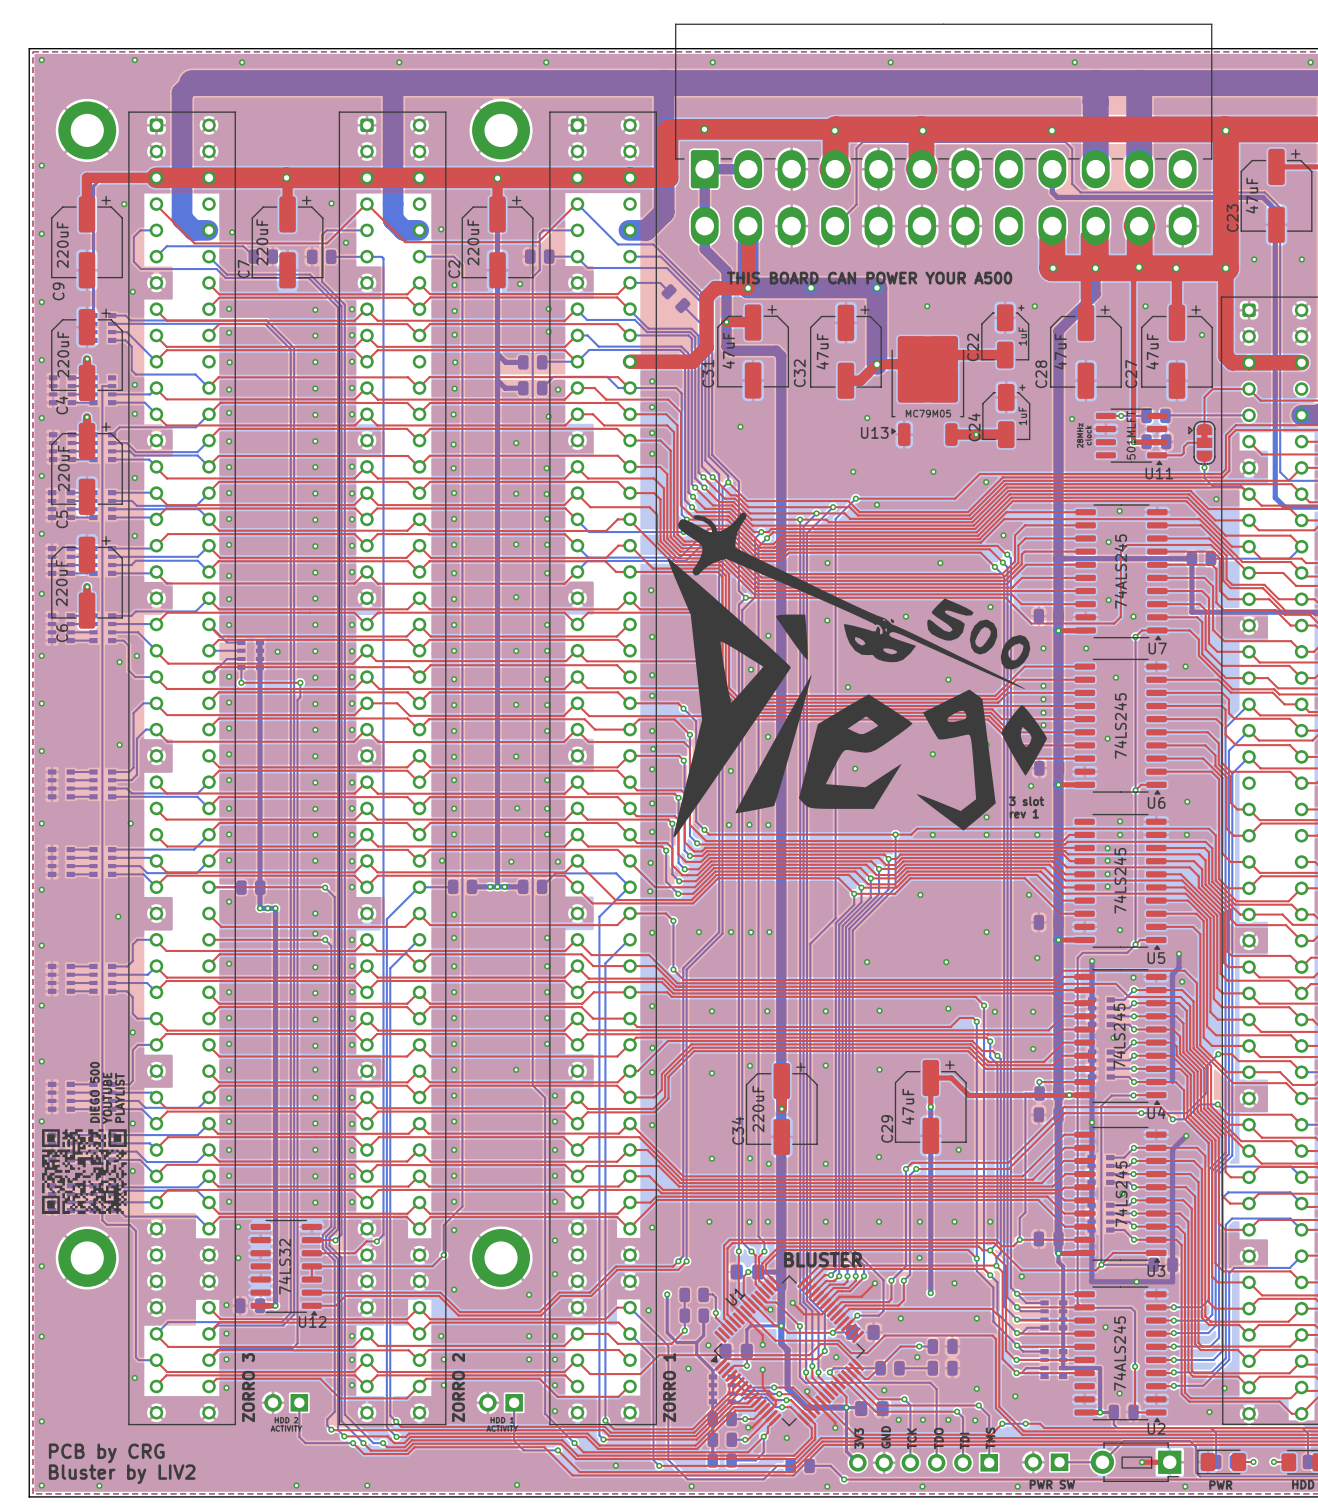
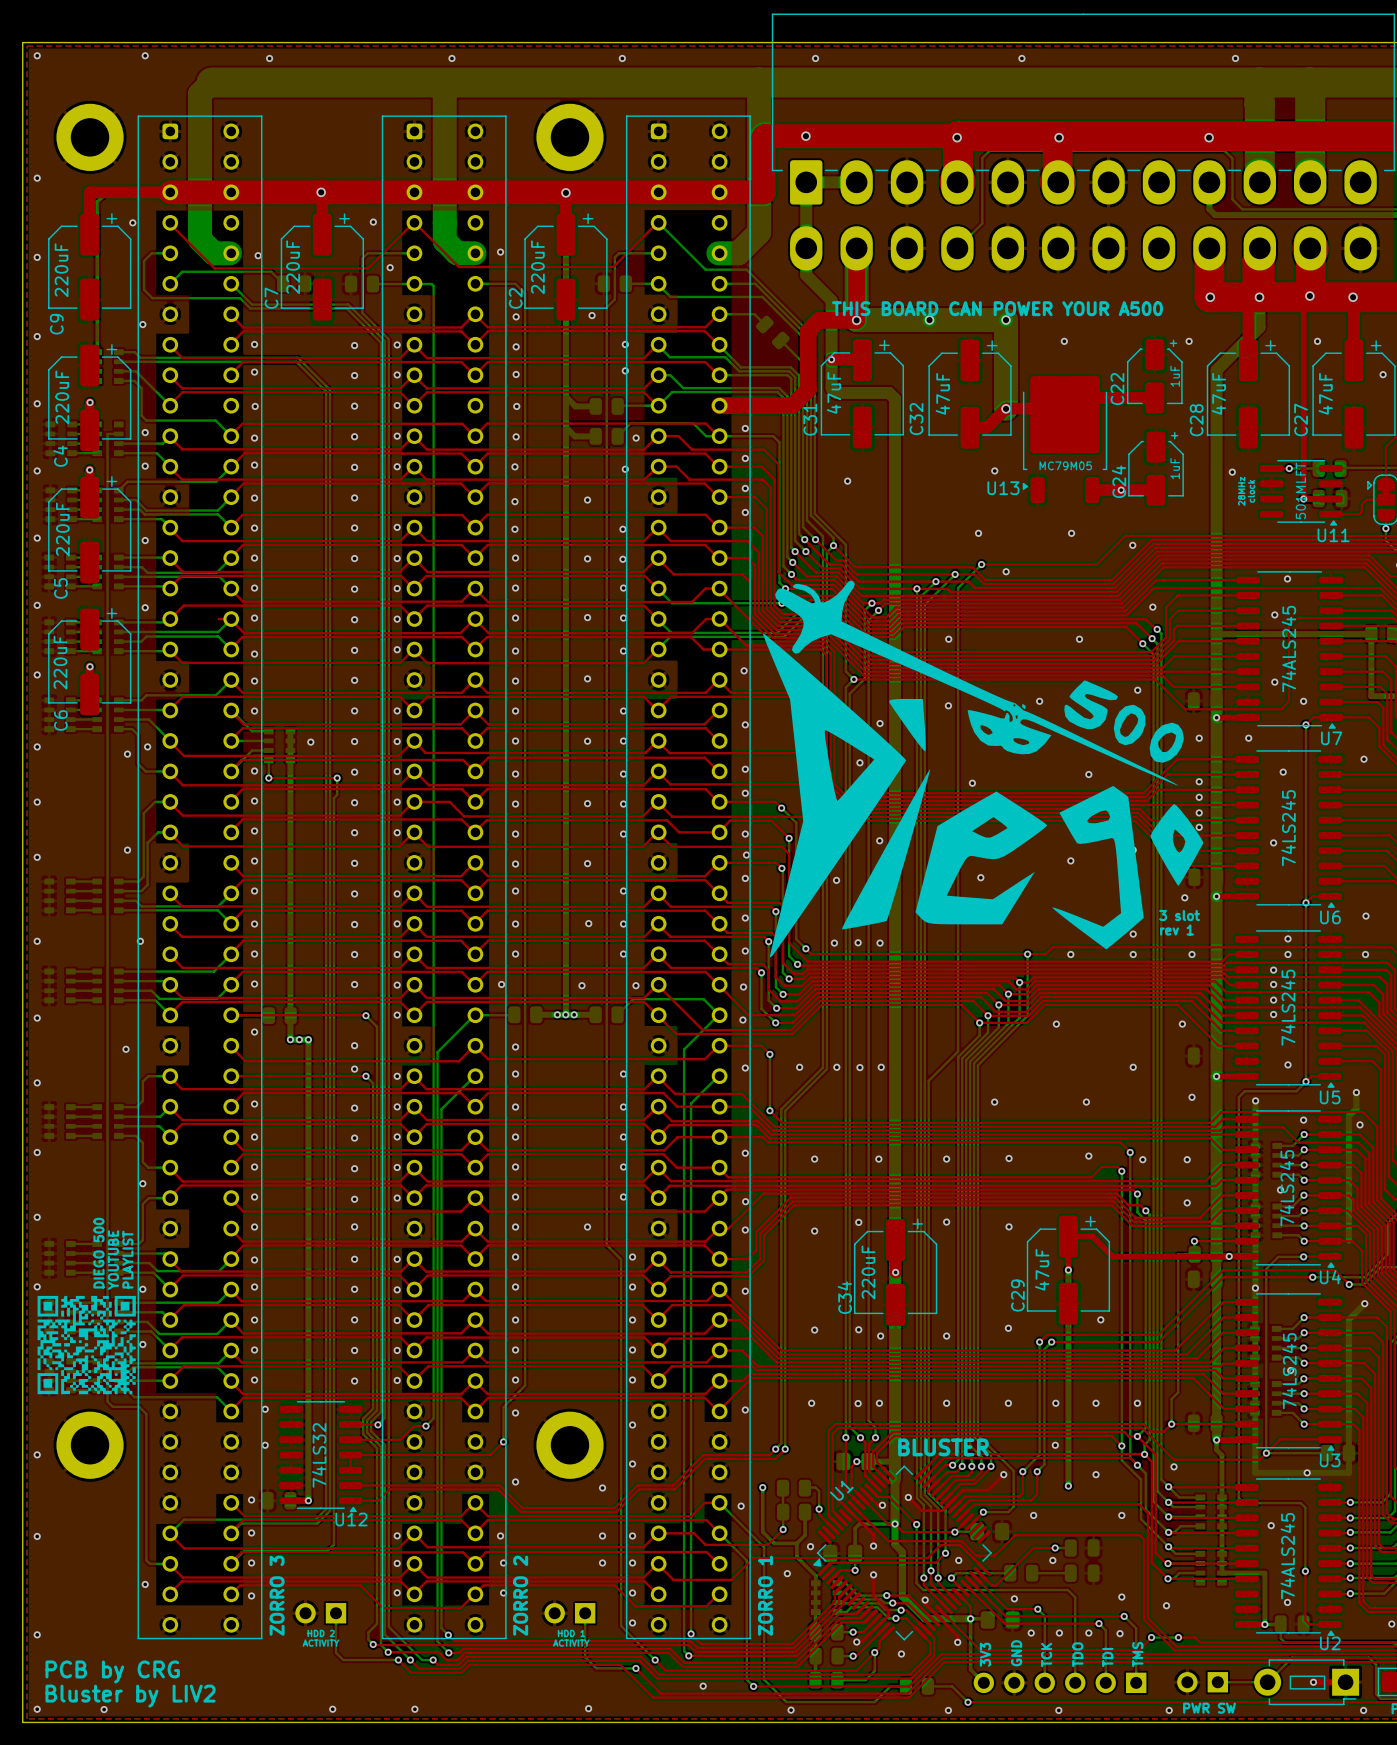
top track: none -> (218, 619) (229, 619)

